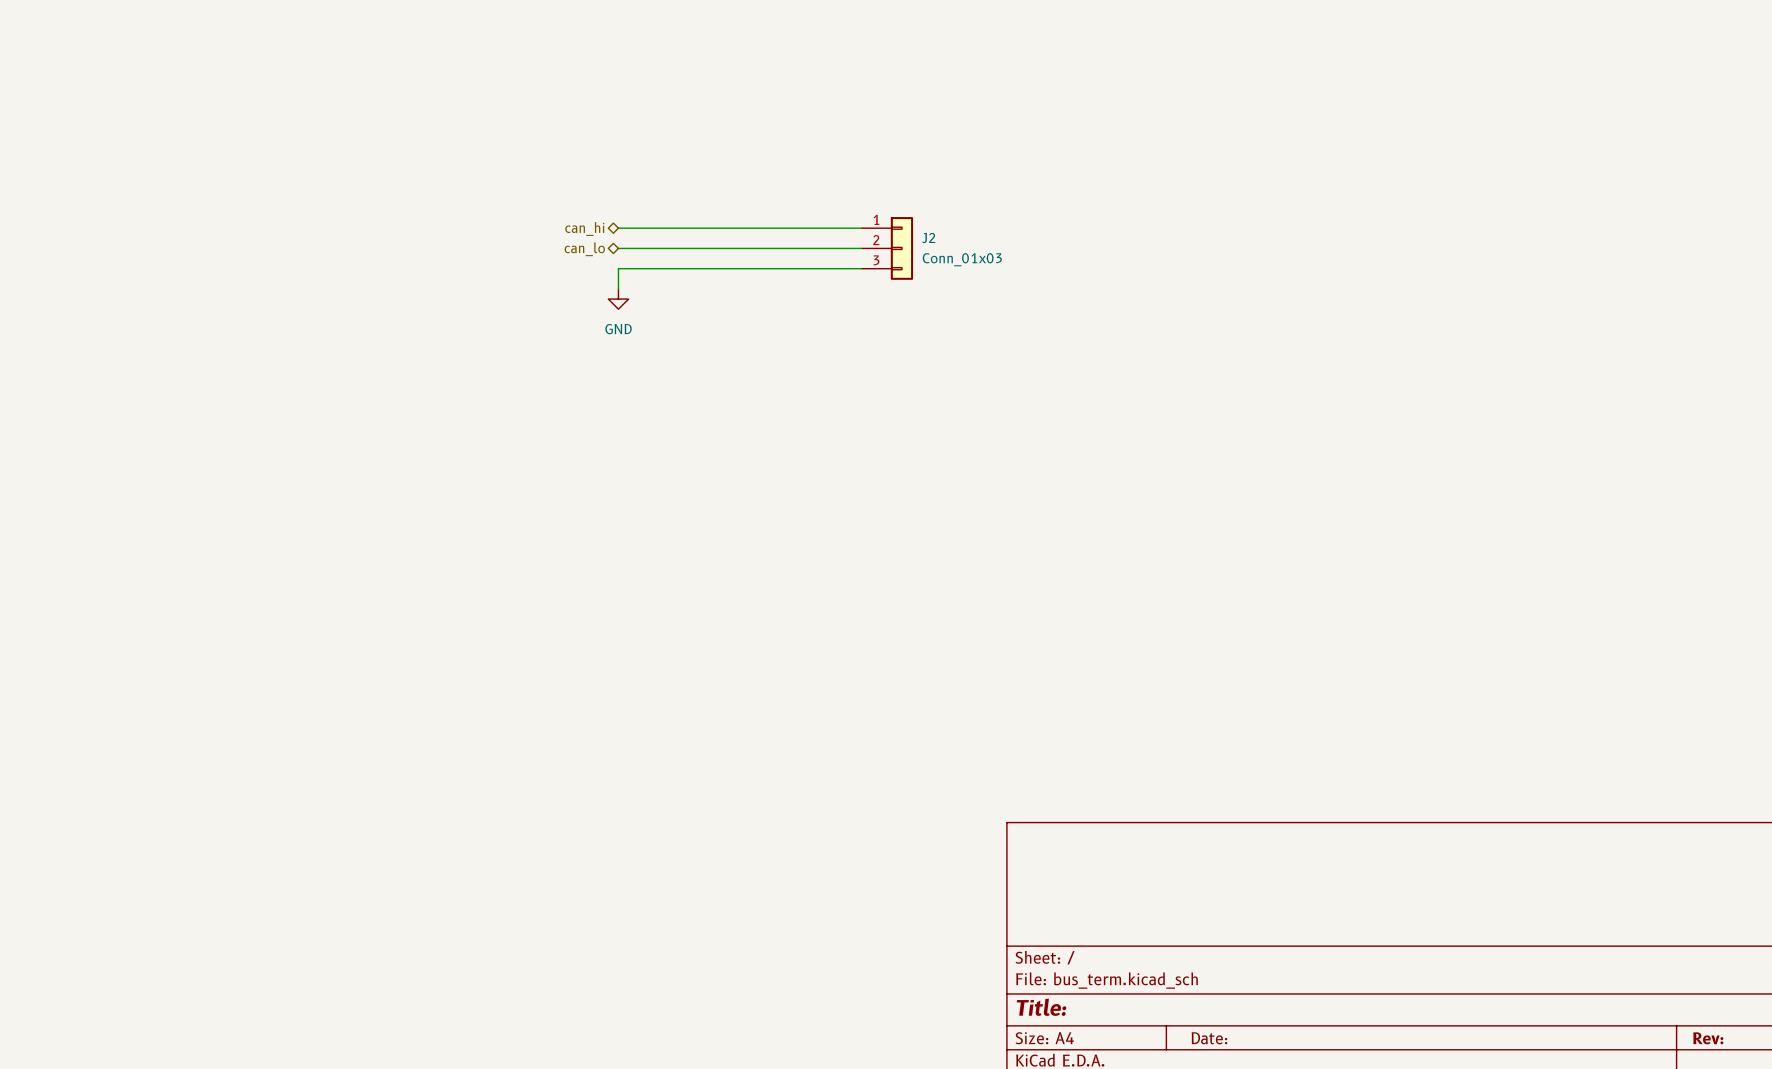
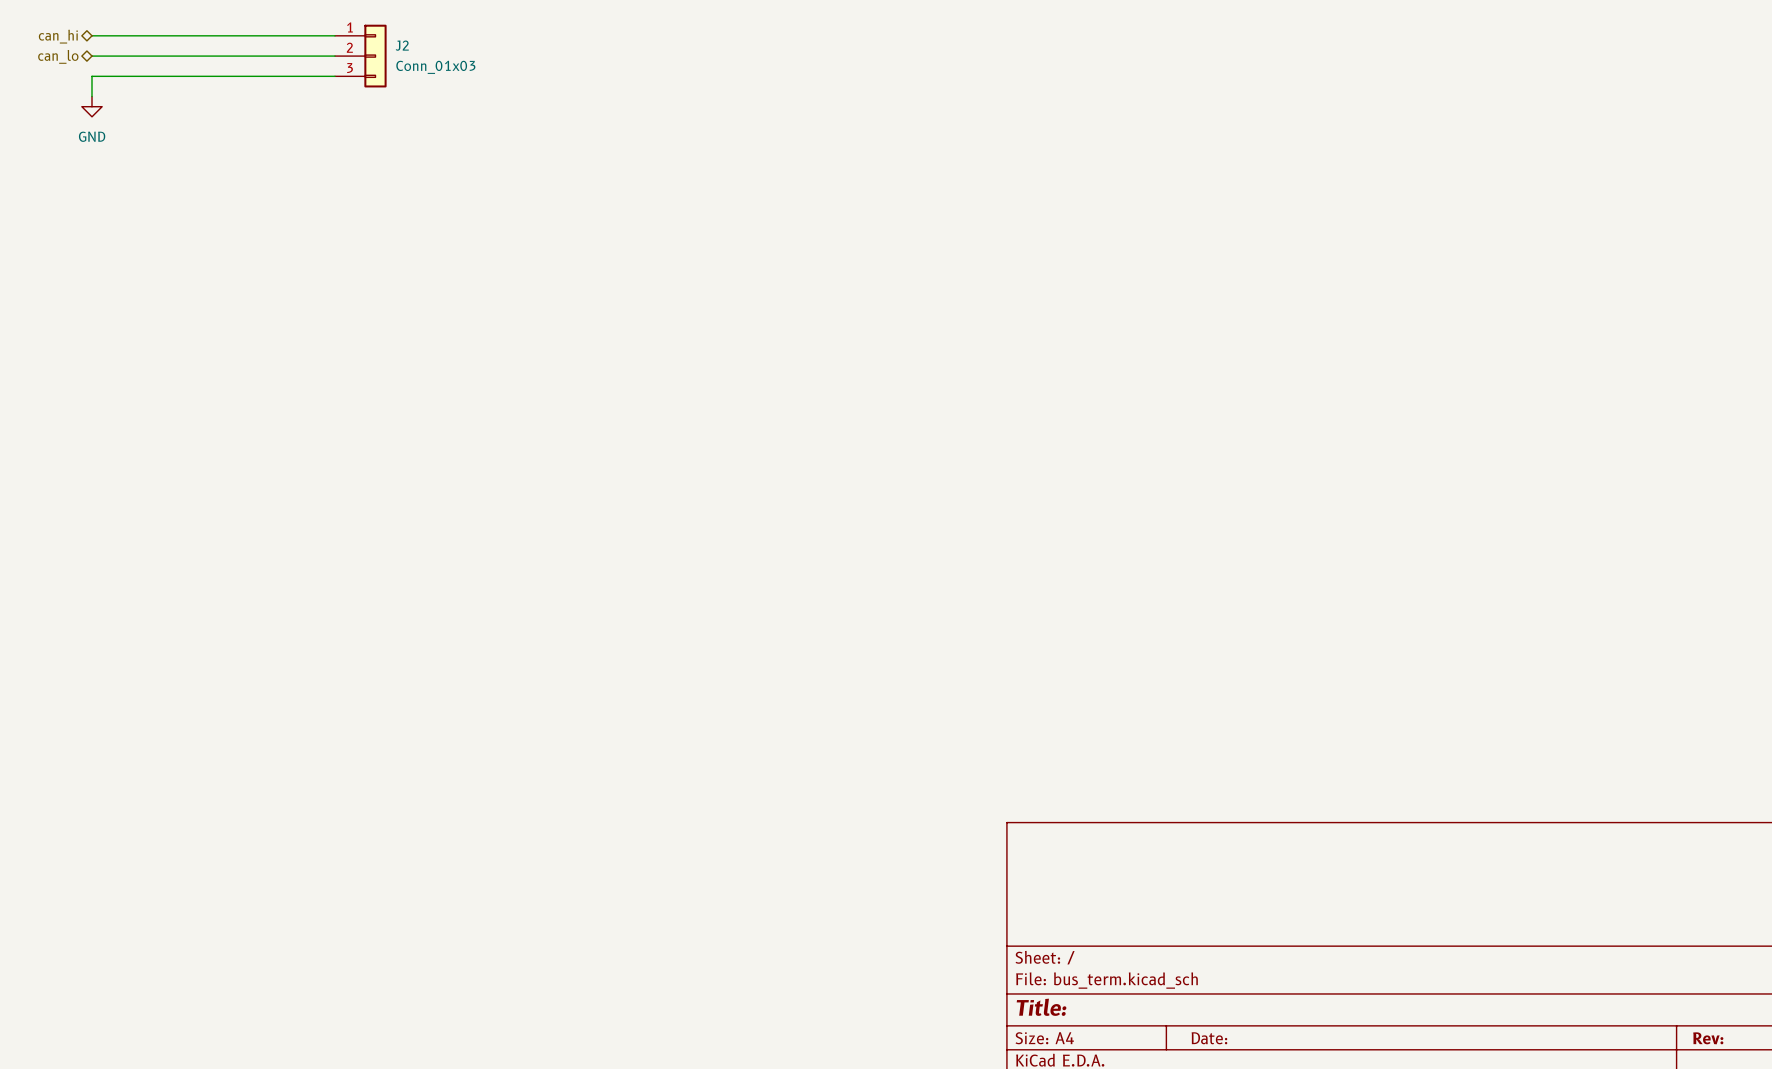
wire: none -> (91, 35) (334, 35)
hierarchical label: none -> can_hi (58, 36)
hierarchical label: none -> can_lo (58, 56)
wire: none -> (91, 56) (334, 56)
wire: none -> (334, 76) (91, 76) (91, 96)
power symbol: none -> GND (91, 106)
hierarchical label: can_hi (584, 228) -> none
wire: (618, 228) (861, 228) -> none
wire: (618, 248) (861, 248) -> none
J2 position: (887, 248) -> (360, 56)
hierarchical label: can_lo (584, 249) -> none
wire: (861, 268) (618, 268) (618, 288) -> none
power symbol: GND (618, 299) -> none

